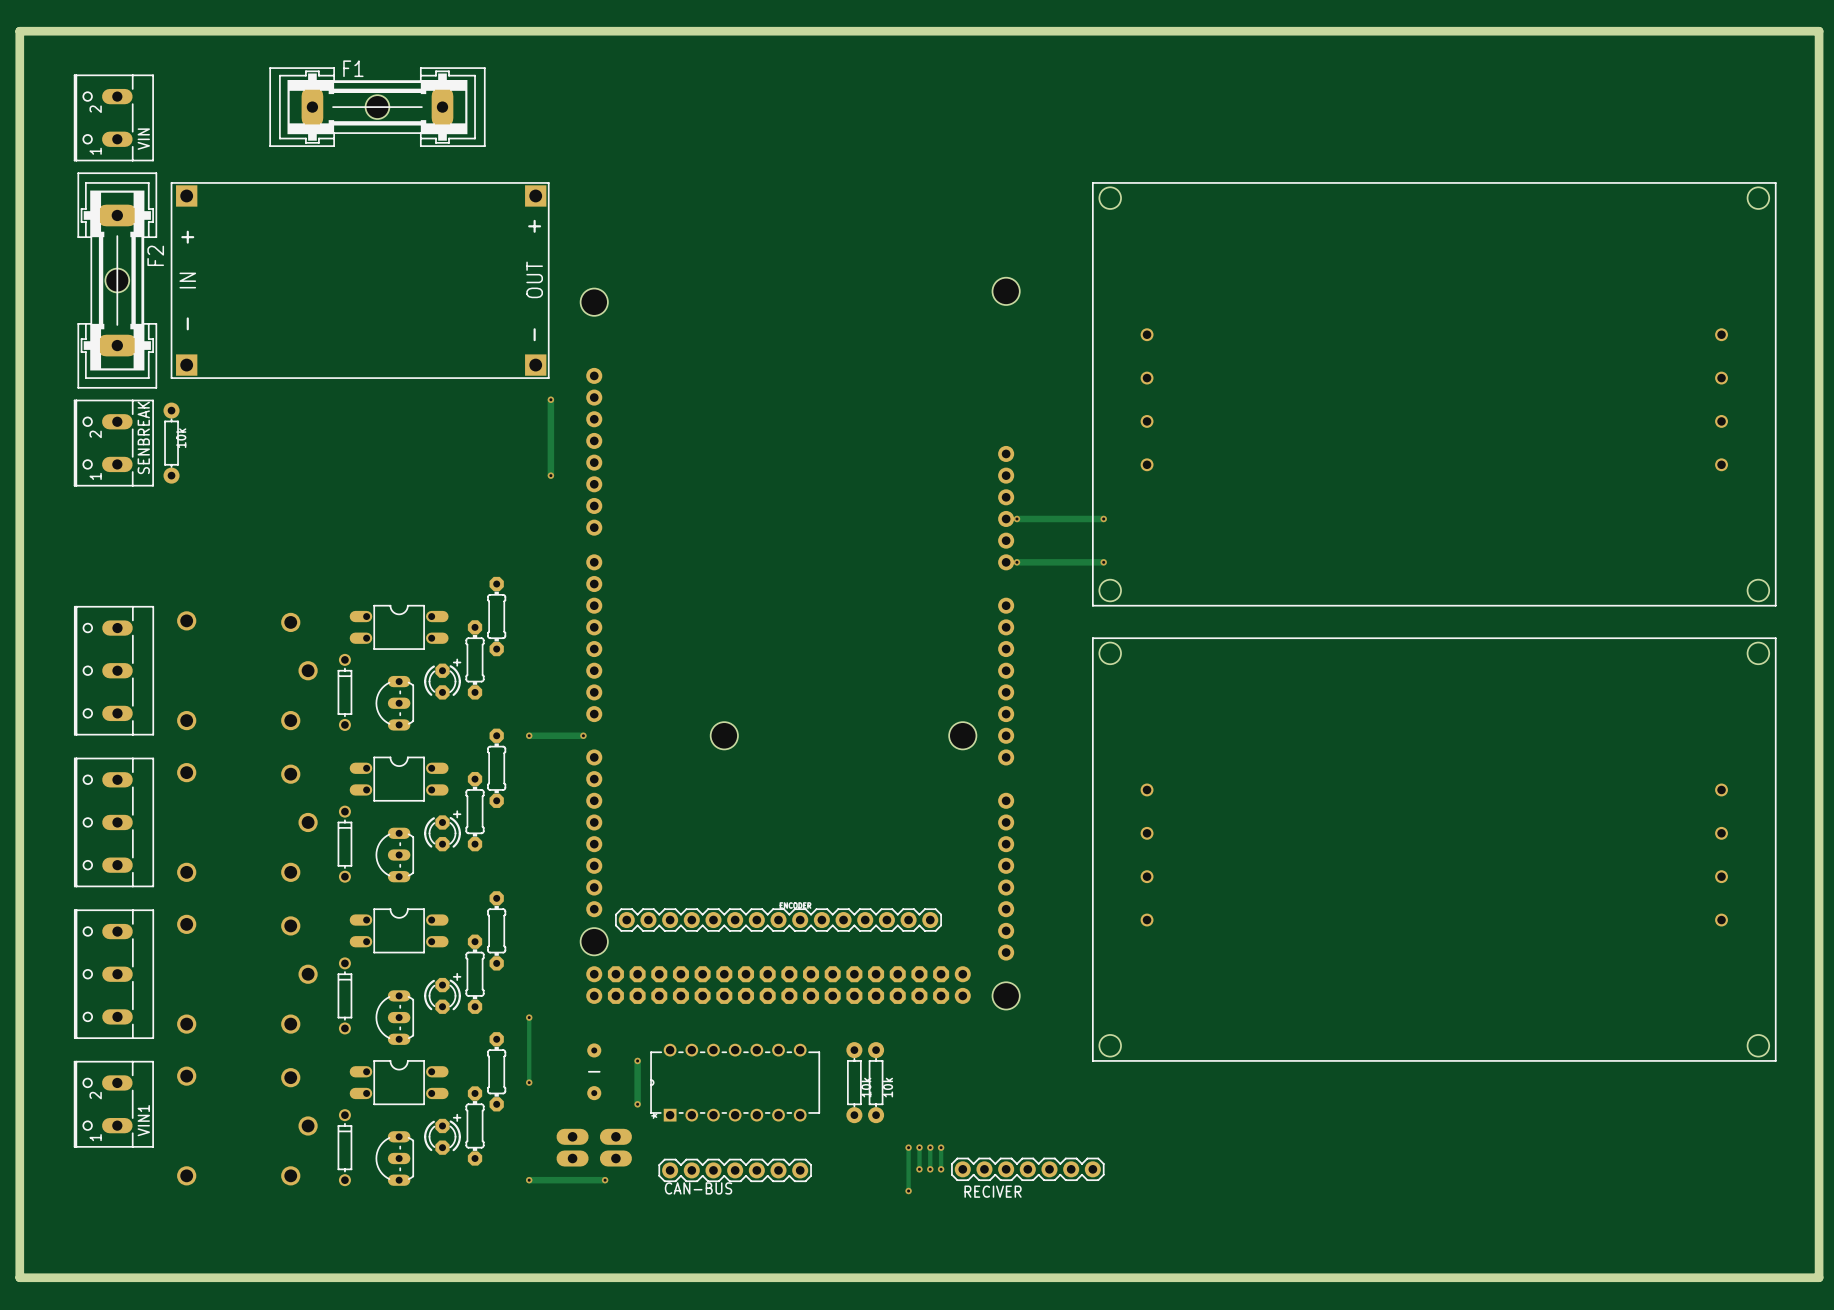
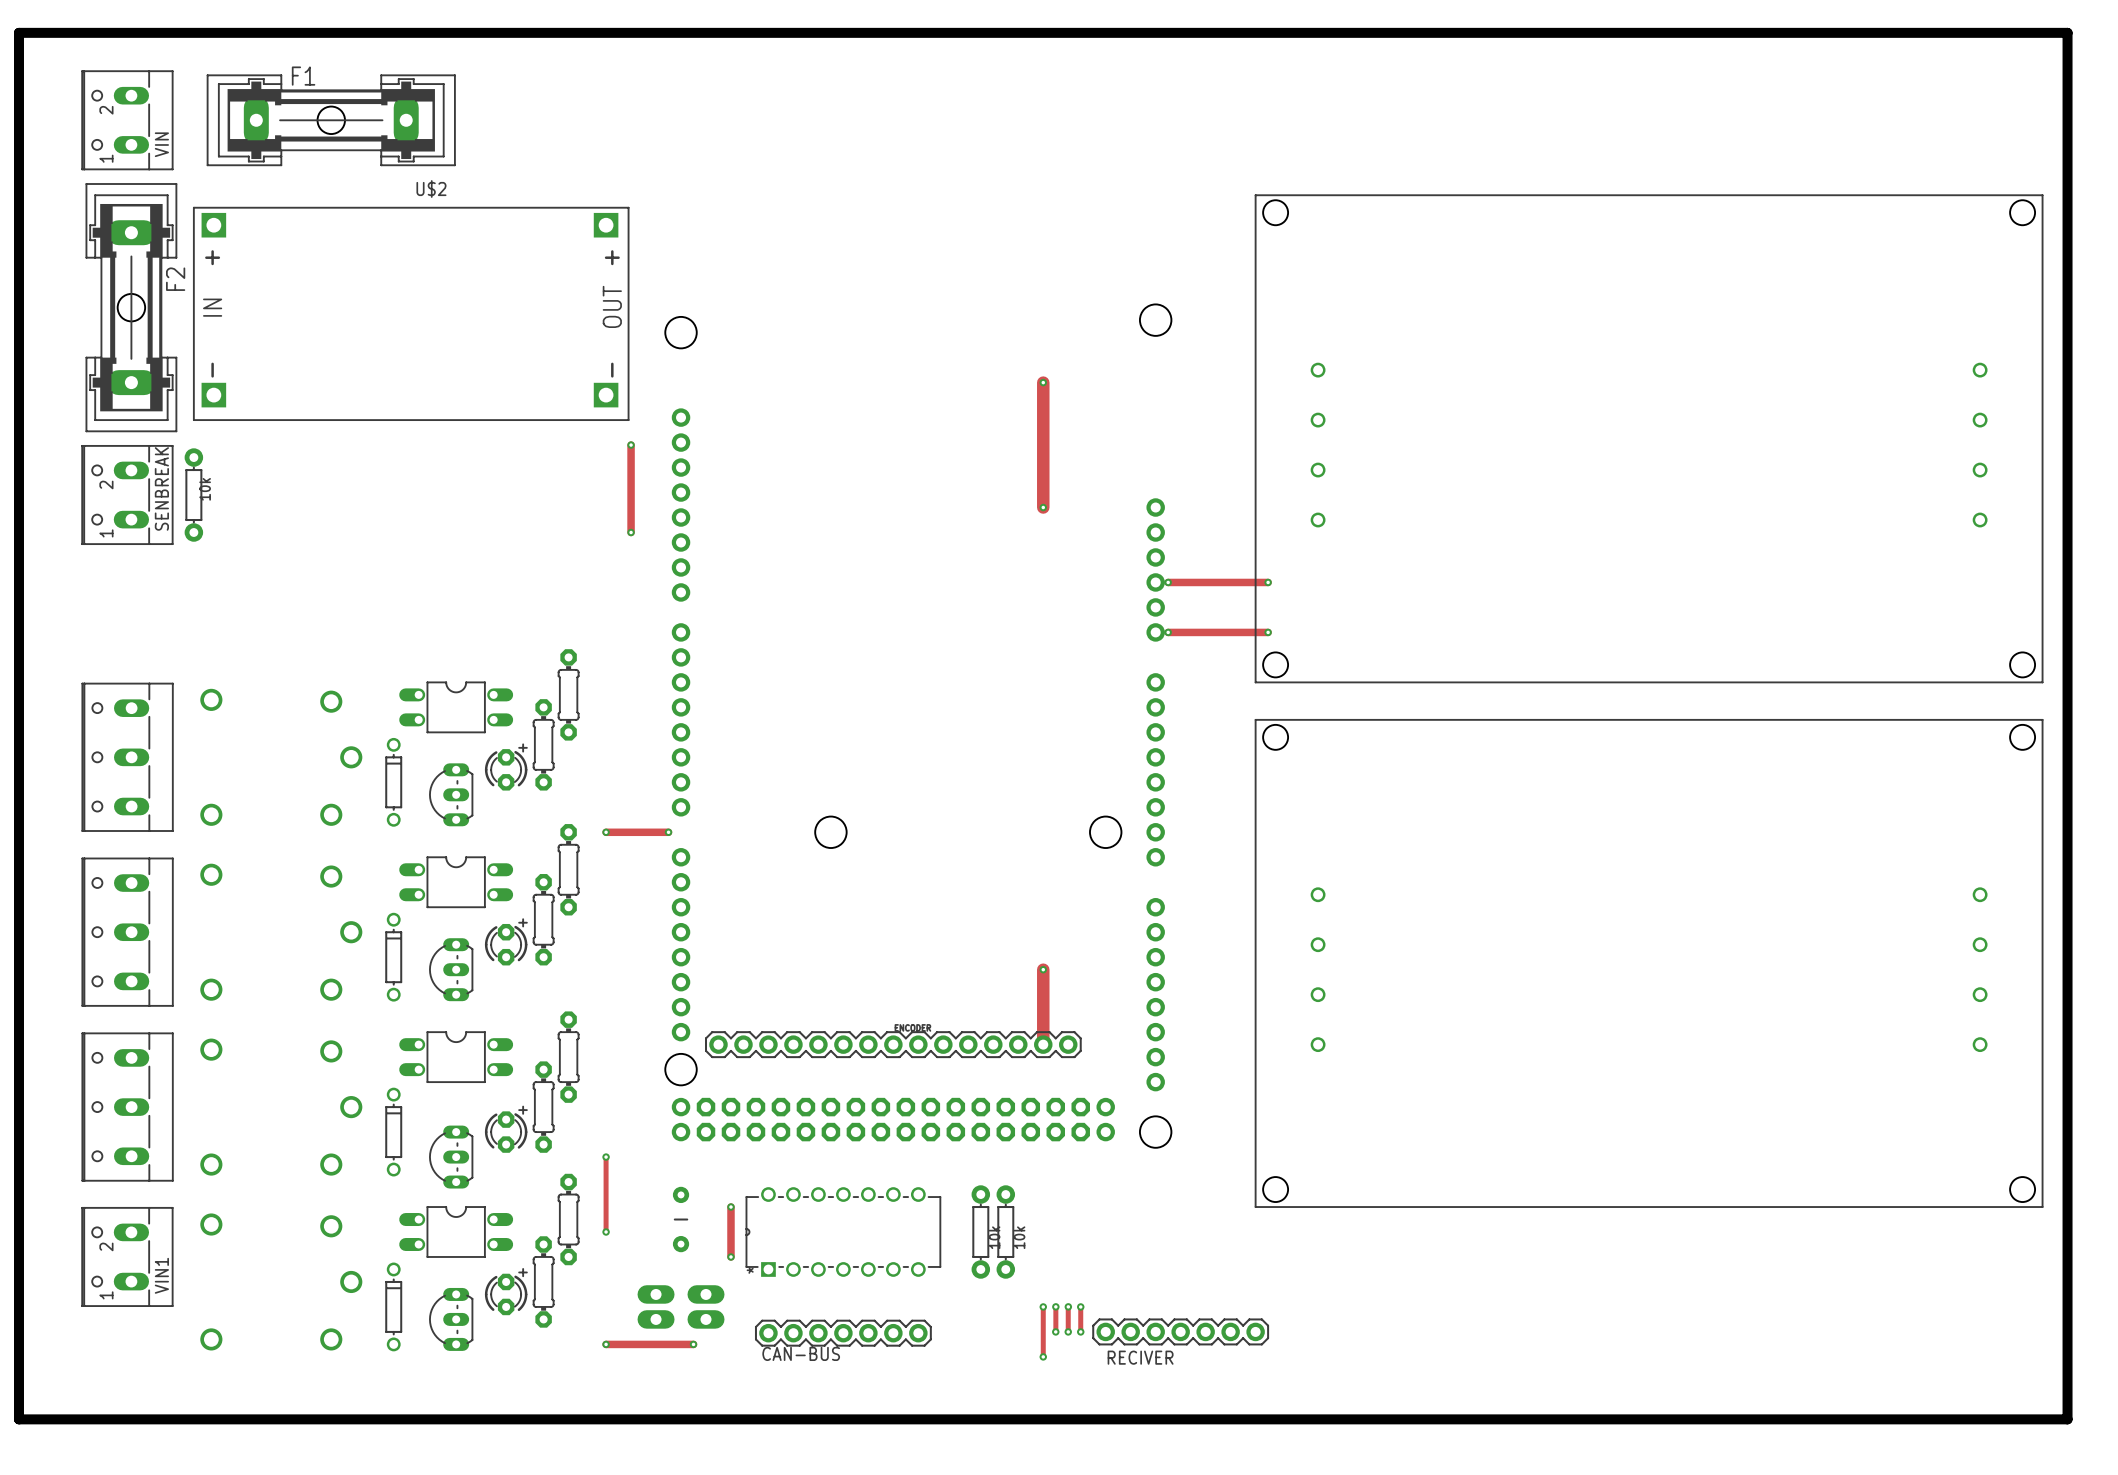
board edge: (19, 42) (19, 31) (1819, 31) (1819, 1277) (19, 1277) (19, 1245) -> (18, 32) (2067, 32) (2067, 1419) (18, 1419)
F1 position: (377, 107) -> (331, 120)
part: (360, 280) -> none
U$2: none -> (411, 313)
track: none -> (1043, 382) (1043, 507)
via: none -> (1043, 382)
via: none -> (1043, 507)
track: none -> (1043, 969) (1043, 1044)
via: none -> (1043, 969)

